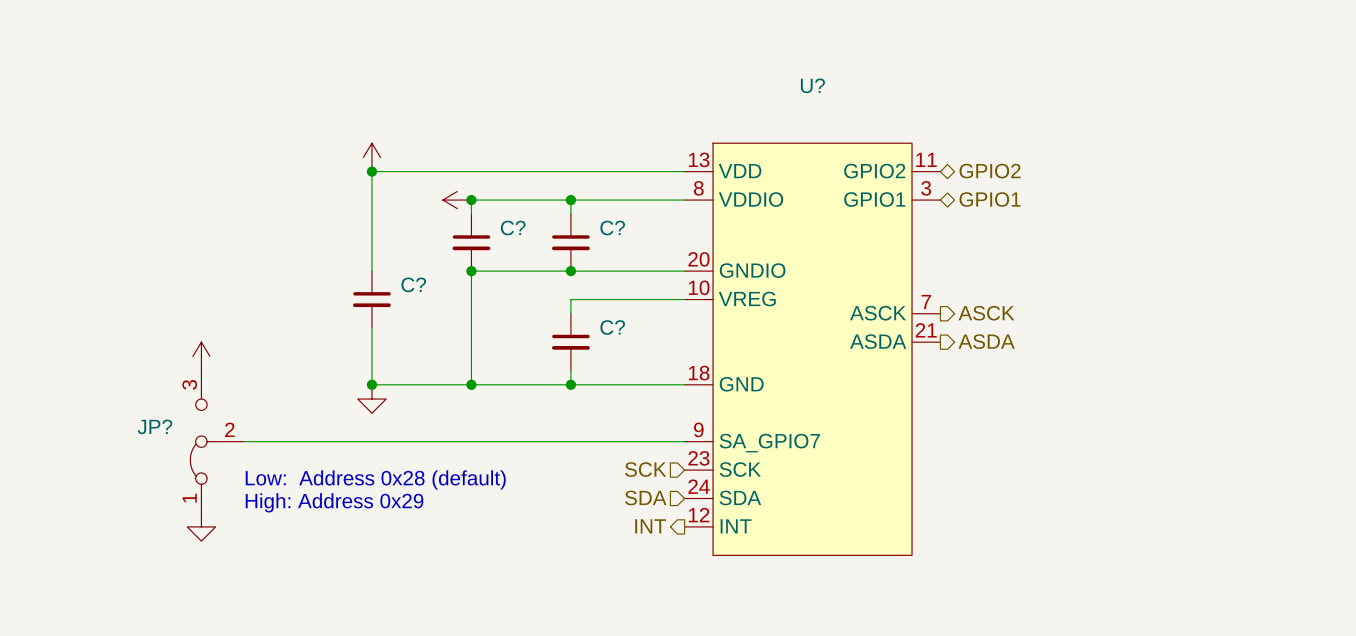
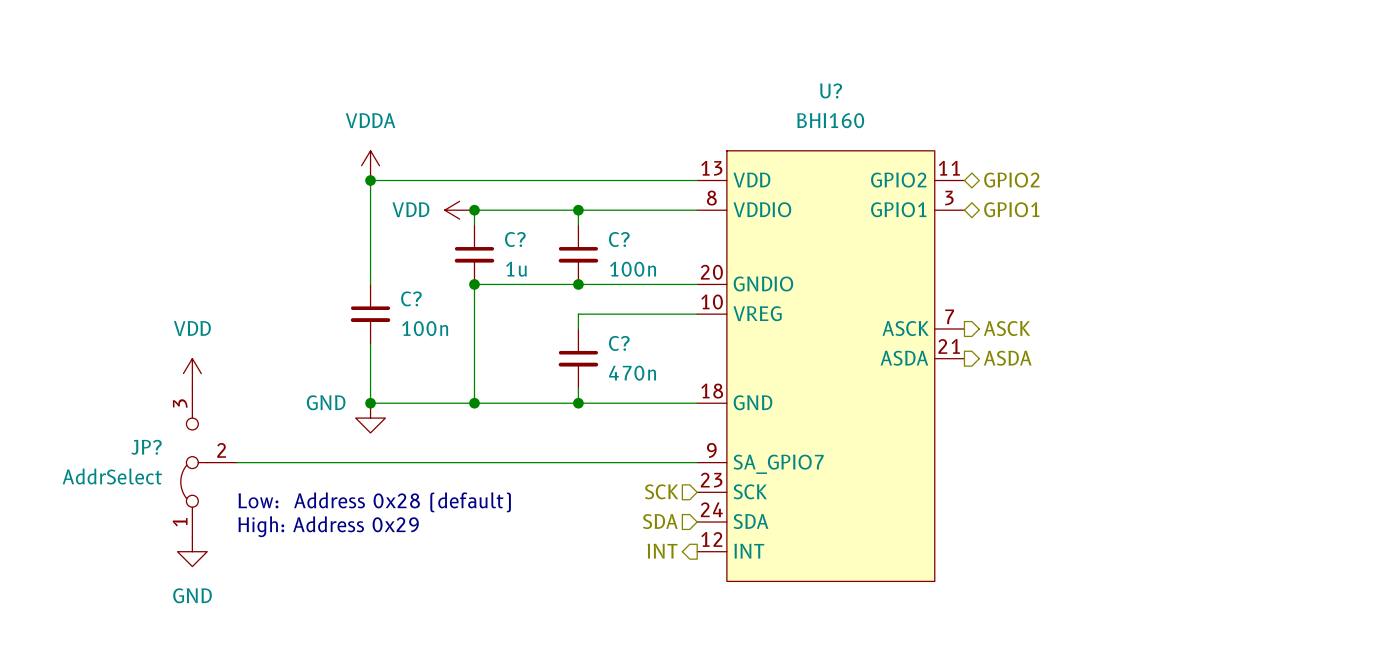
power symbol text: none -> VDDA (370, 120)
U? value: none -> BHI160 (830, 120)
power symbol text: none -> VDD (410, 209)
C? value: none -> 1u (516, 269)
C? value: none -> 100n (633, 269)
power symbol text: none -> VDD (192, 328)
C? value: none -> 100n (425, 328)
C? value: none -> 470n (632, 373)
power symbol text: none -> GND (326, 402)
JP? value: none -> AddrSelect (112, 476)
power symbol text: none -> GND (192, 595)

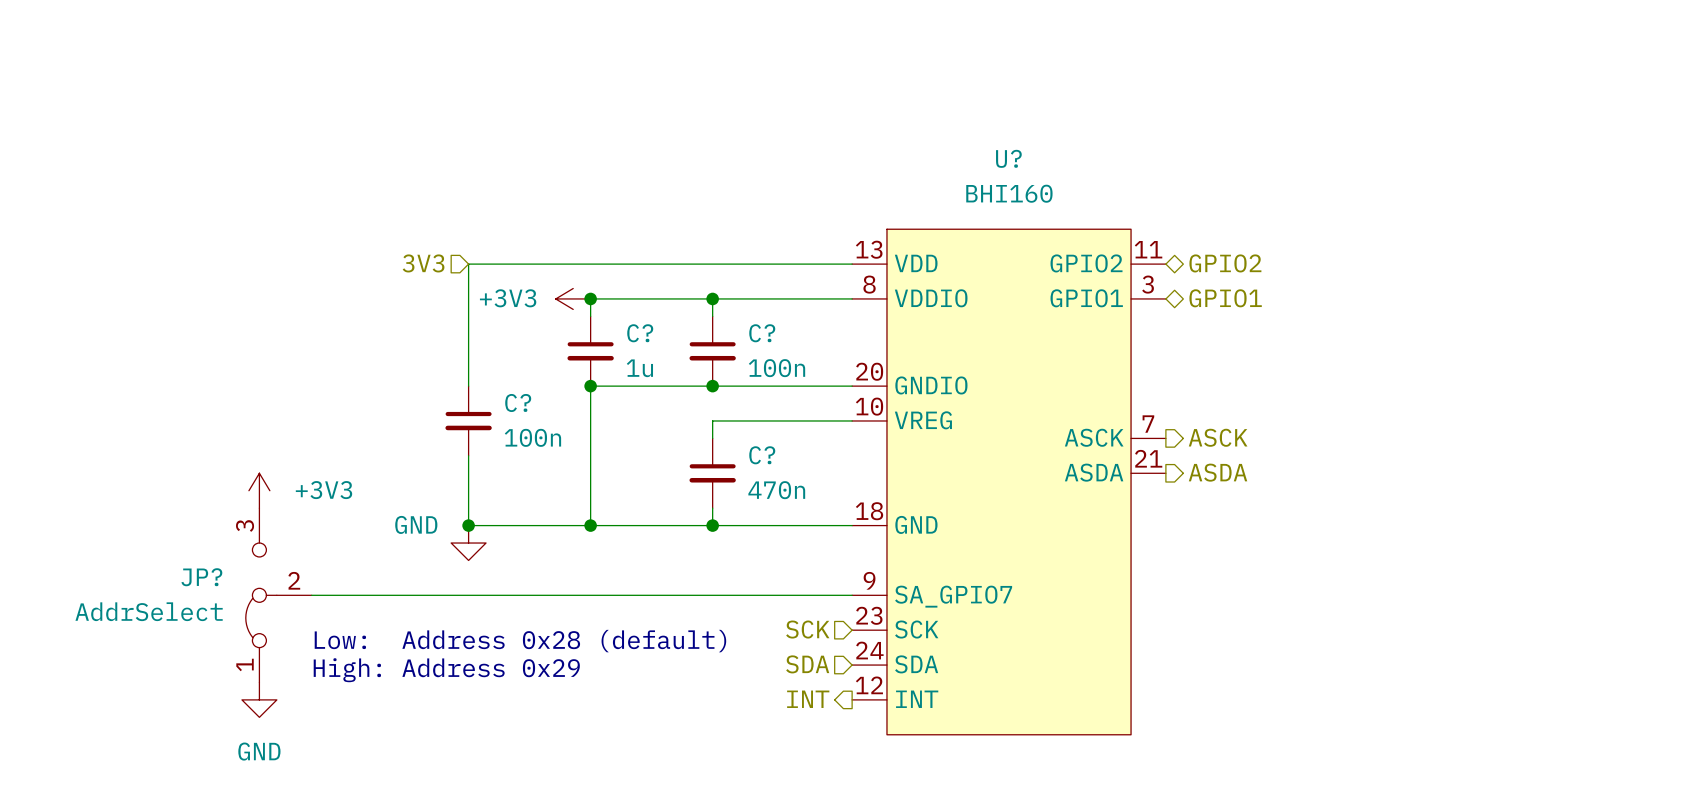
power symbol: VDDA (370, 165) -> none
hierarchical label: none -> 3V3 (423, 263)
junction: (370, 180) -> none
power symbol: VDD (459, 210) -> +3V3 (573, 298)
power symbol: VDD (192, 373) -> +3V3 (259, 490)

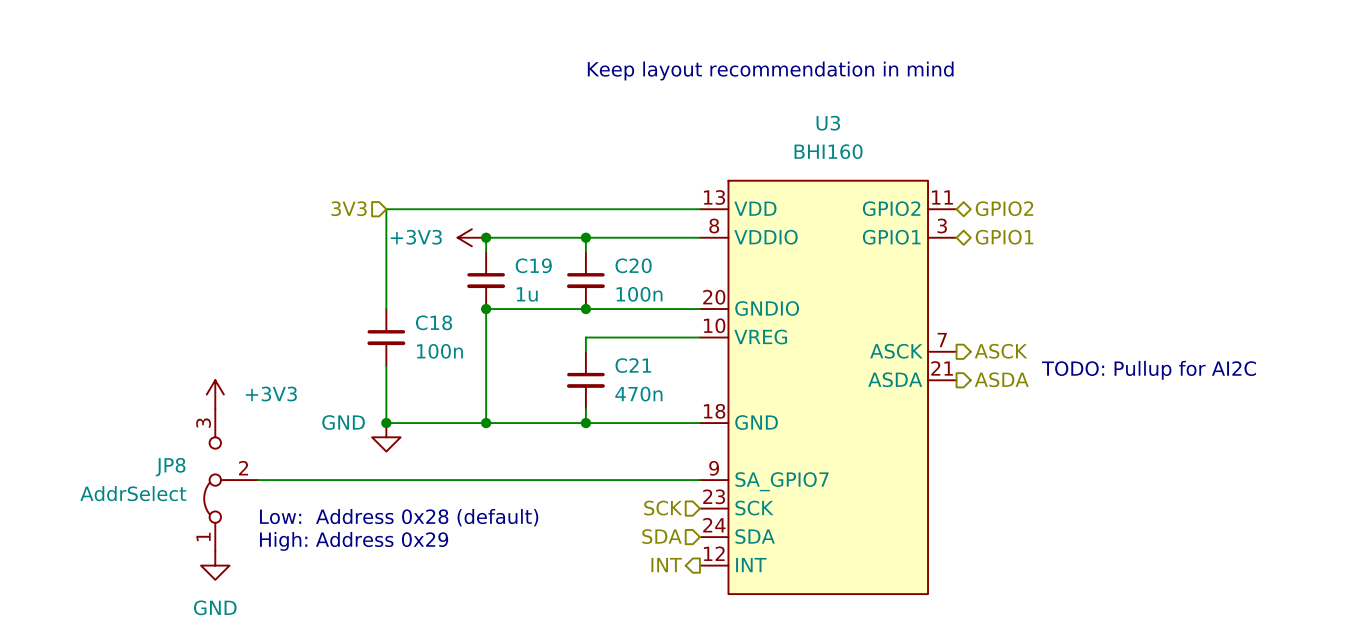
text: none -> Keep layout recommendation in mind (770, 71)
U? name: U? (1008, 158) -> U3 (828, 123)
C? name: C? (640, 333) -> C19 (533, 265)
C? name: C? (762, 333) -> C20 (633, 265)
C? name: C? (518, 402) -> C18 (434, 322)
C? name: C? (762, 455) -> C21 (633, 365)
text: none -> TODO: Pullup for AI2C (1148, 370)
JP? name: JP? (201, 577) -> JP8 (170, 467)

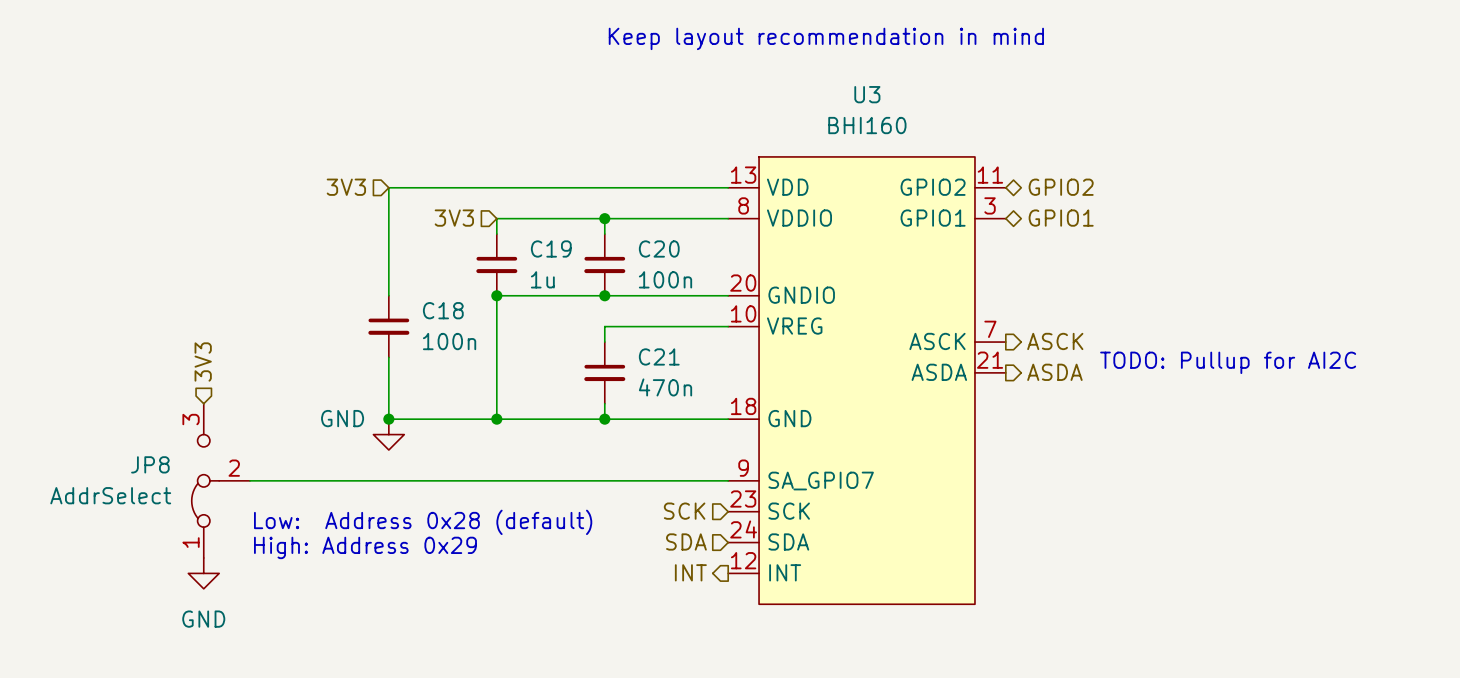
hierarchical label: none -> 3V3 (454, 218)
power symbol: +3V3 (471, 237) -> none
junction: (486, 237) -> none
hierarchical label: none -> 3V3 (203, 362)
power symbol: +3V3 (215, 394) -> none

